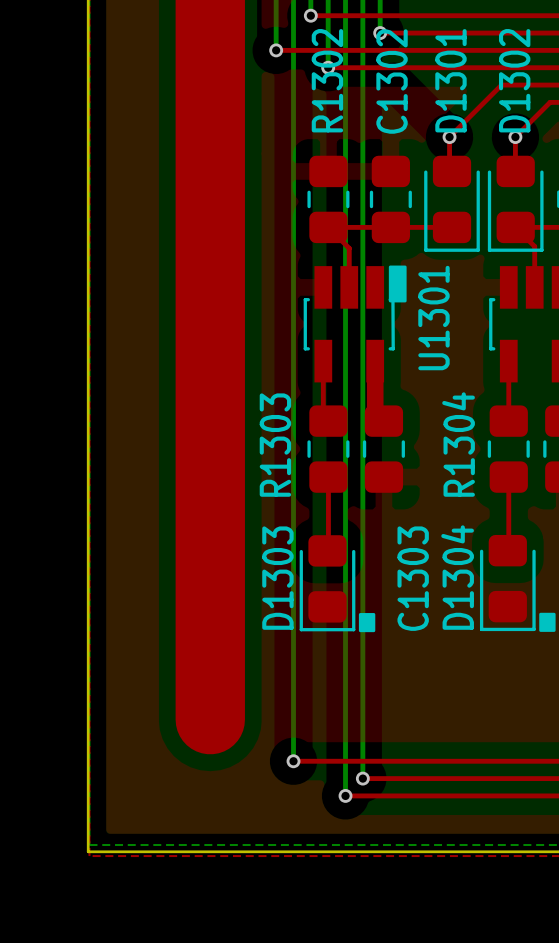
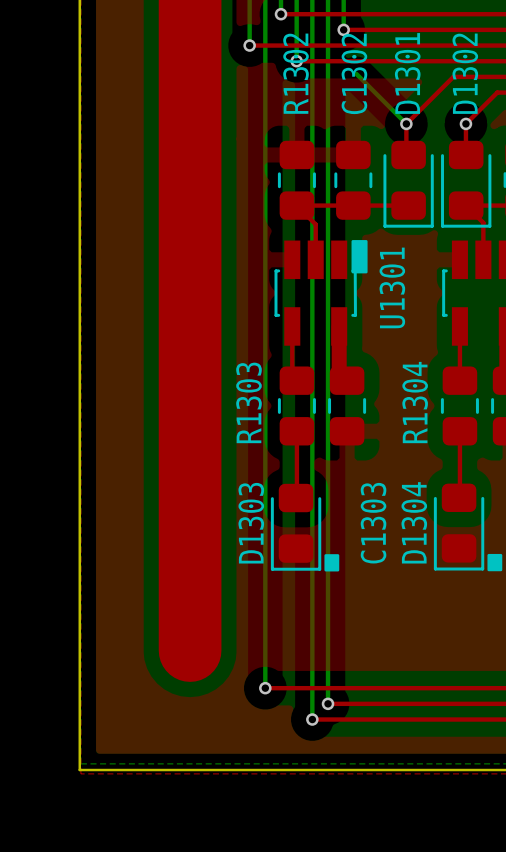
bottom track: none -> (356, 73) (406, 123)

